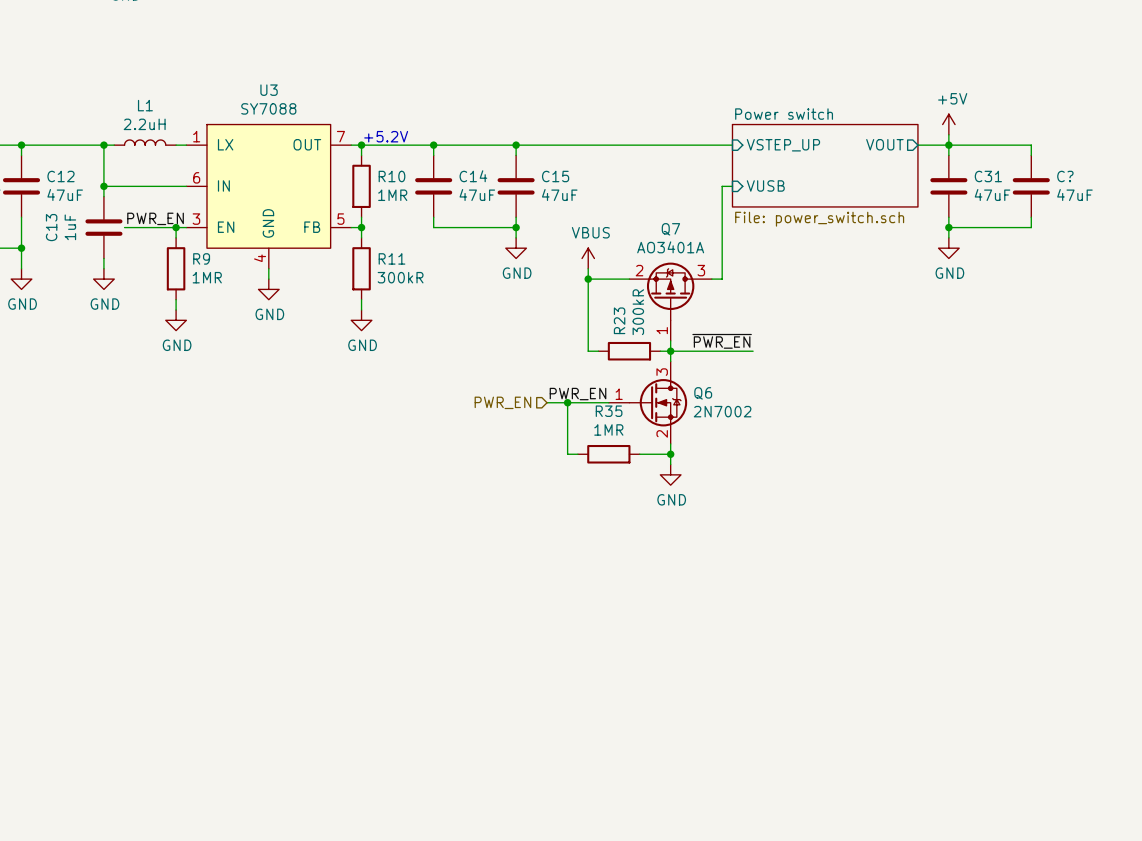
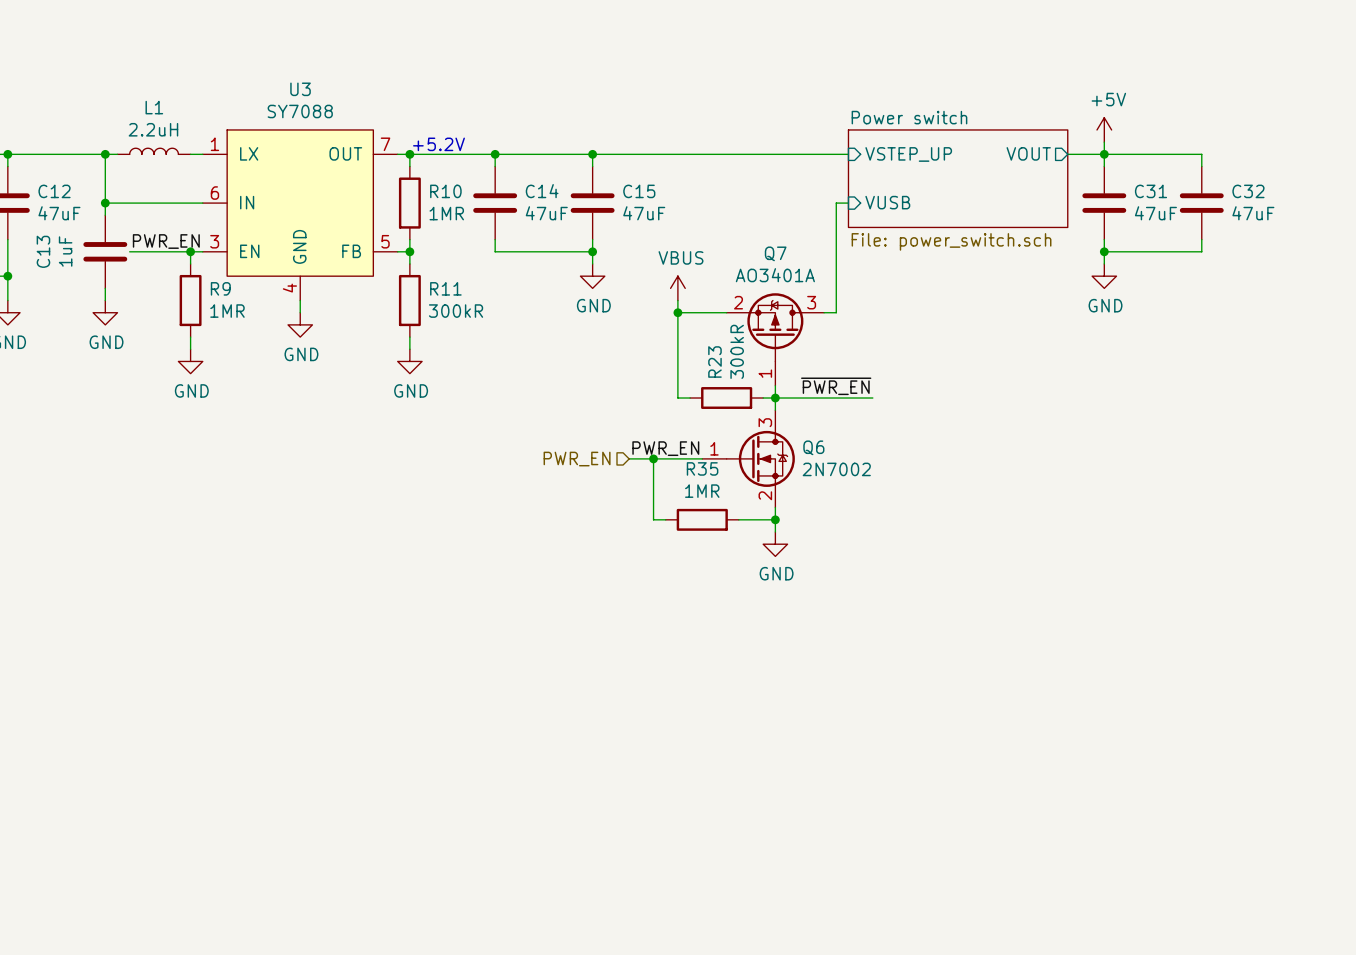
C? name: C? (1065, 176) -> C32 (1248, 191)

